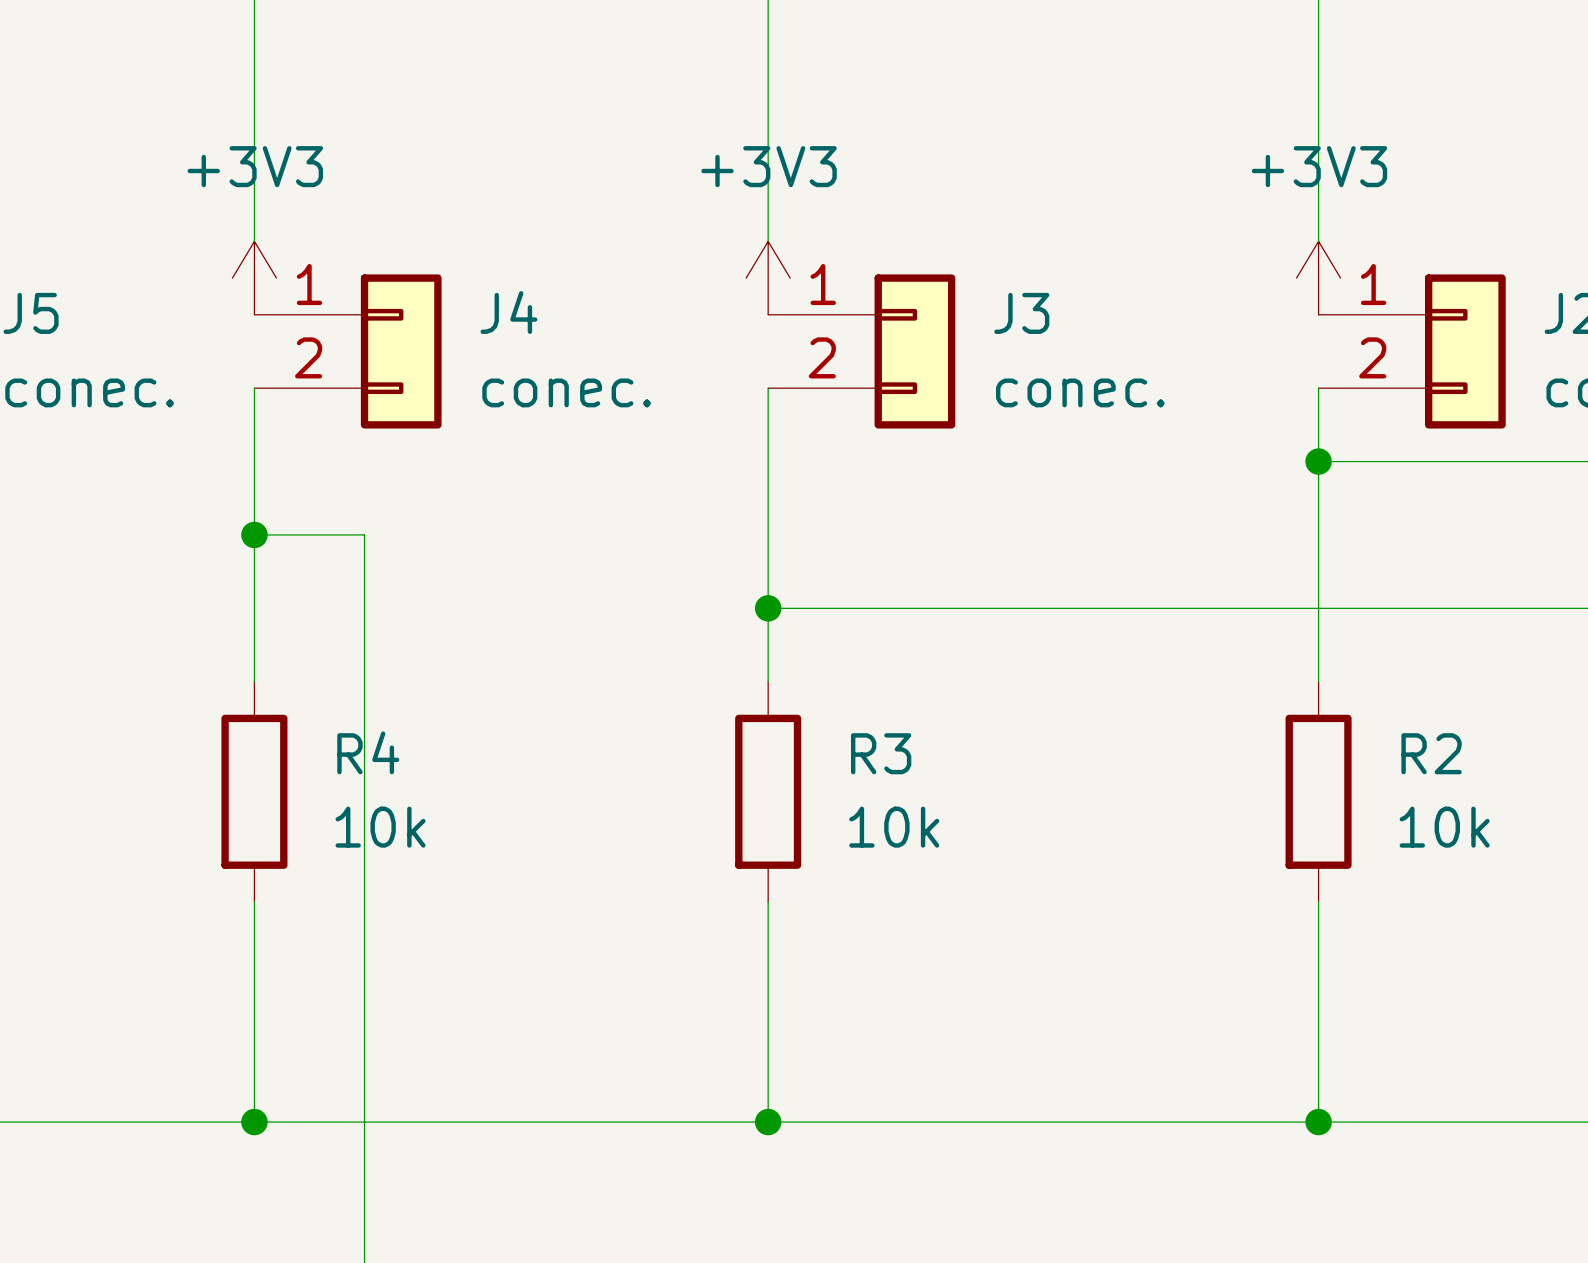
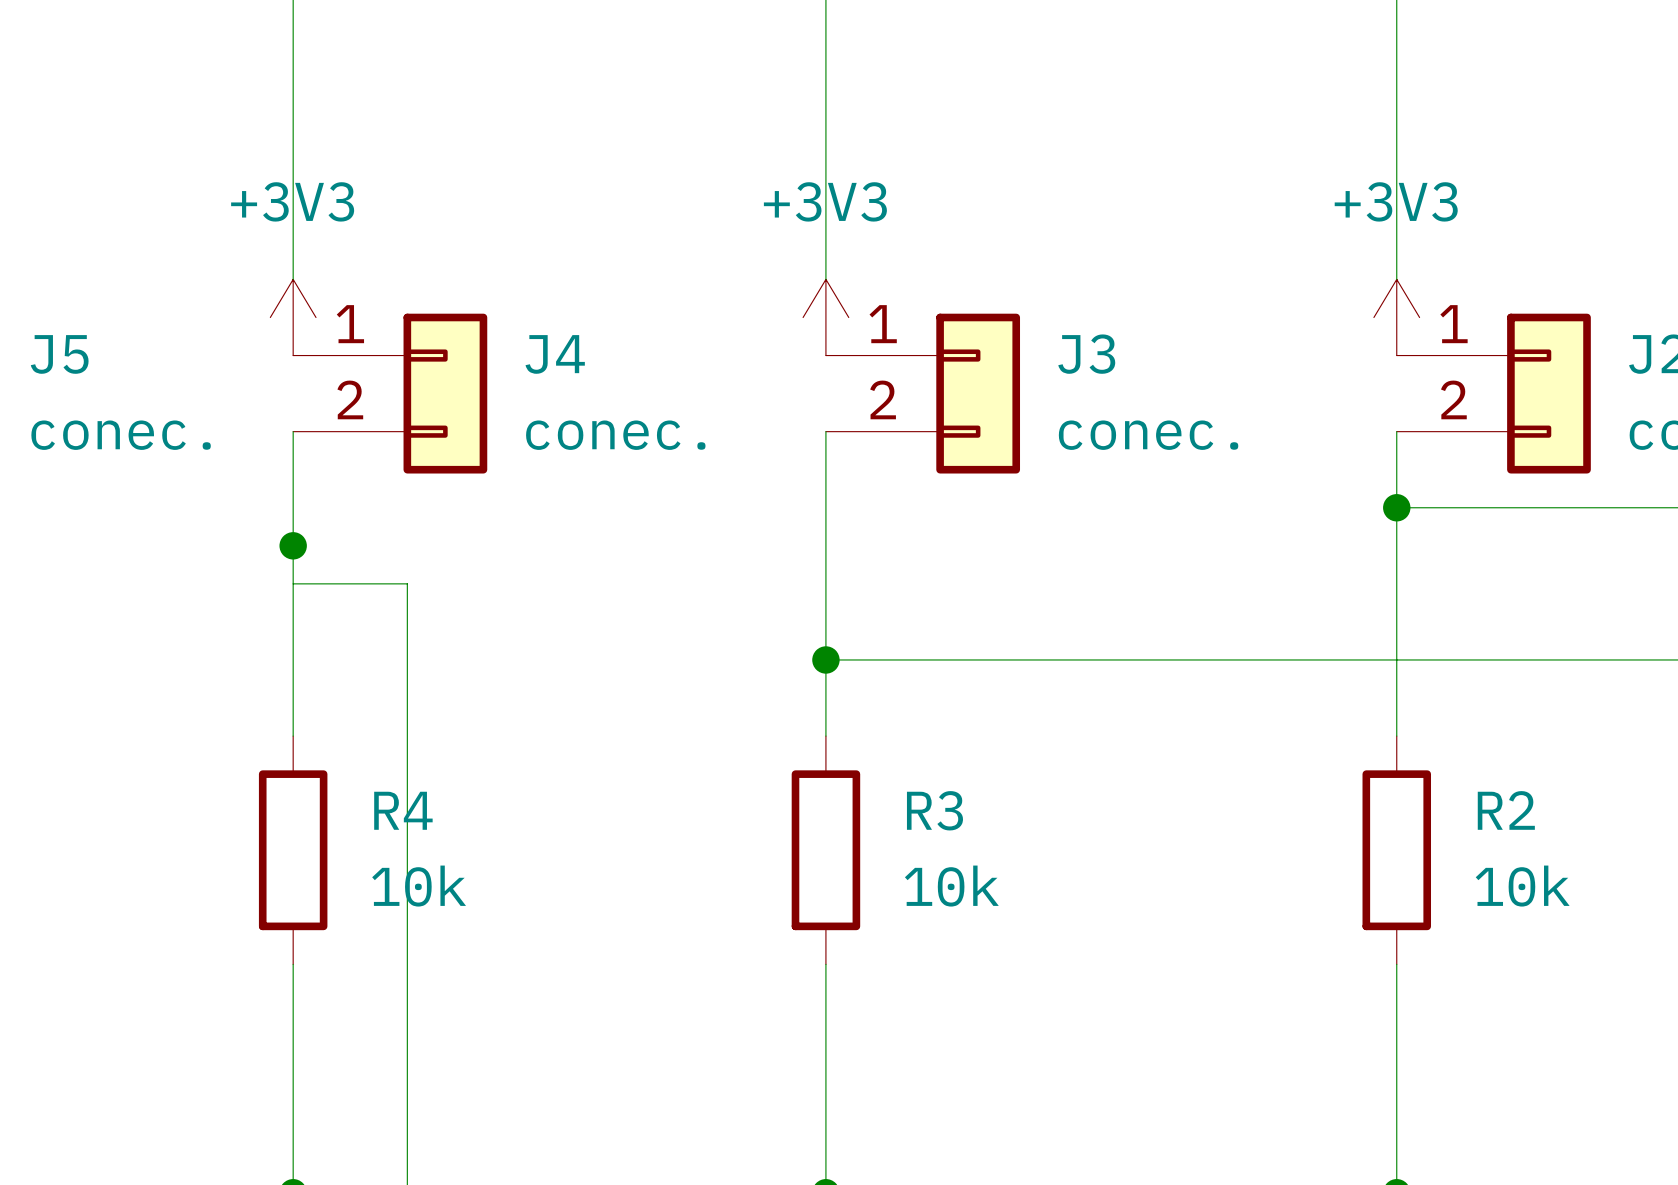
junction position: (254, 534) -> (293, 545)

